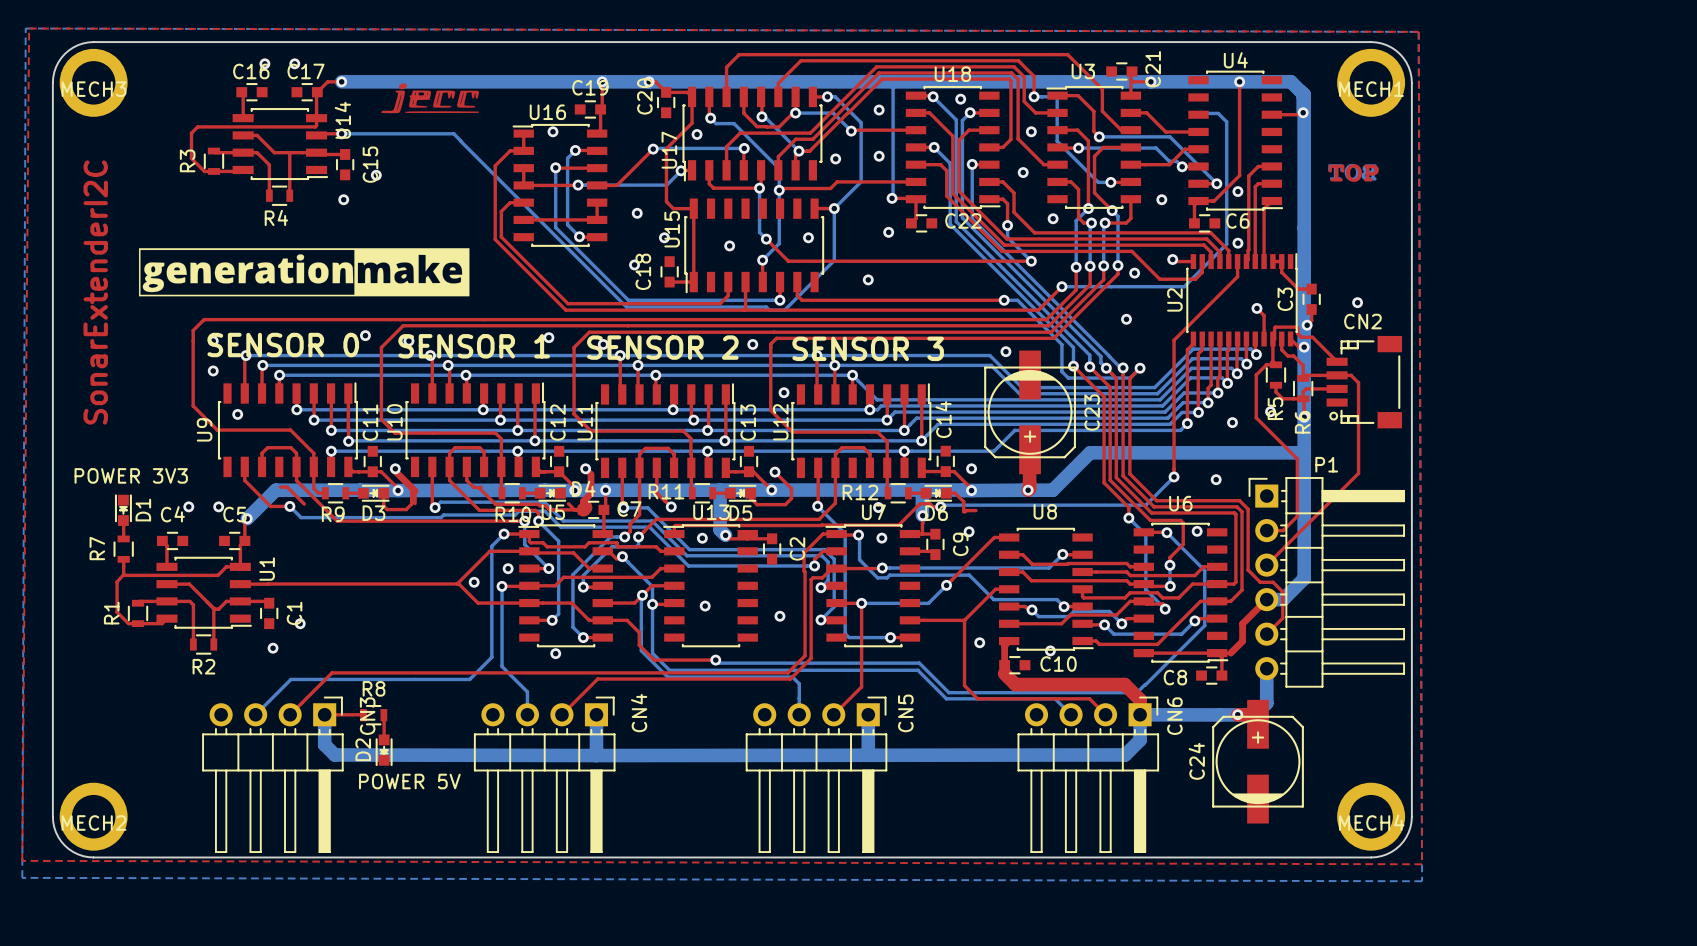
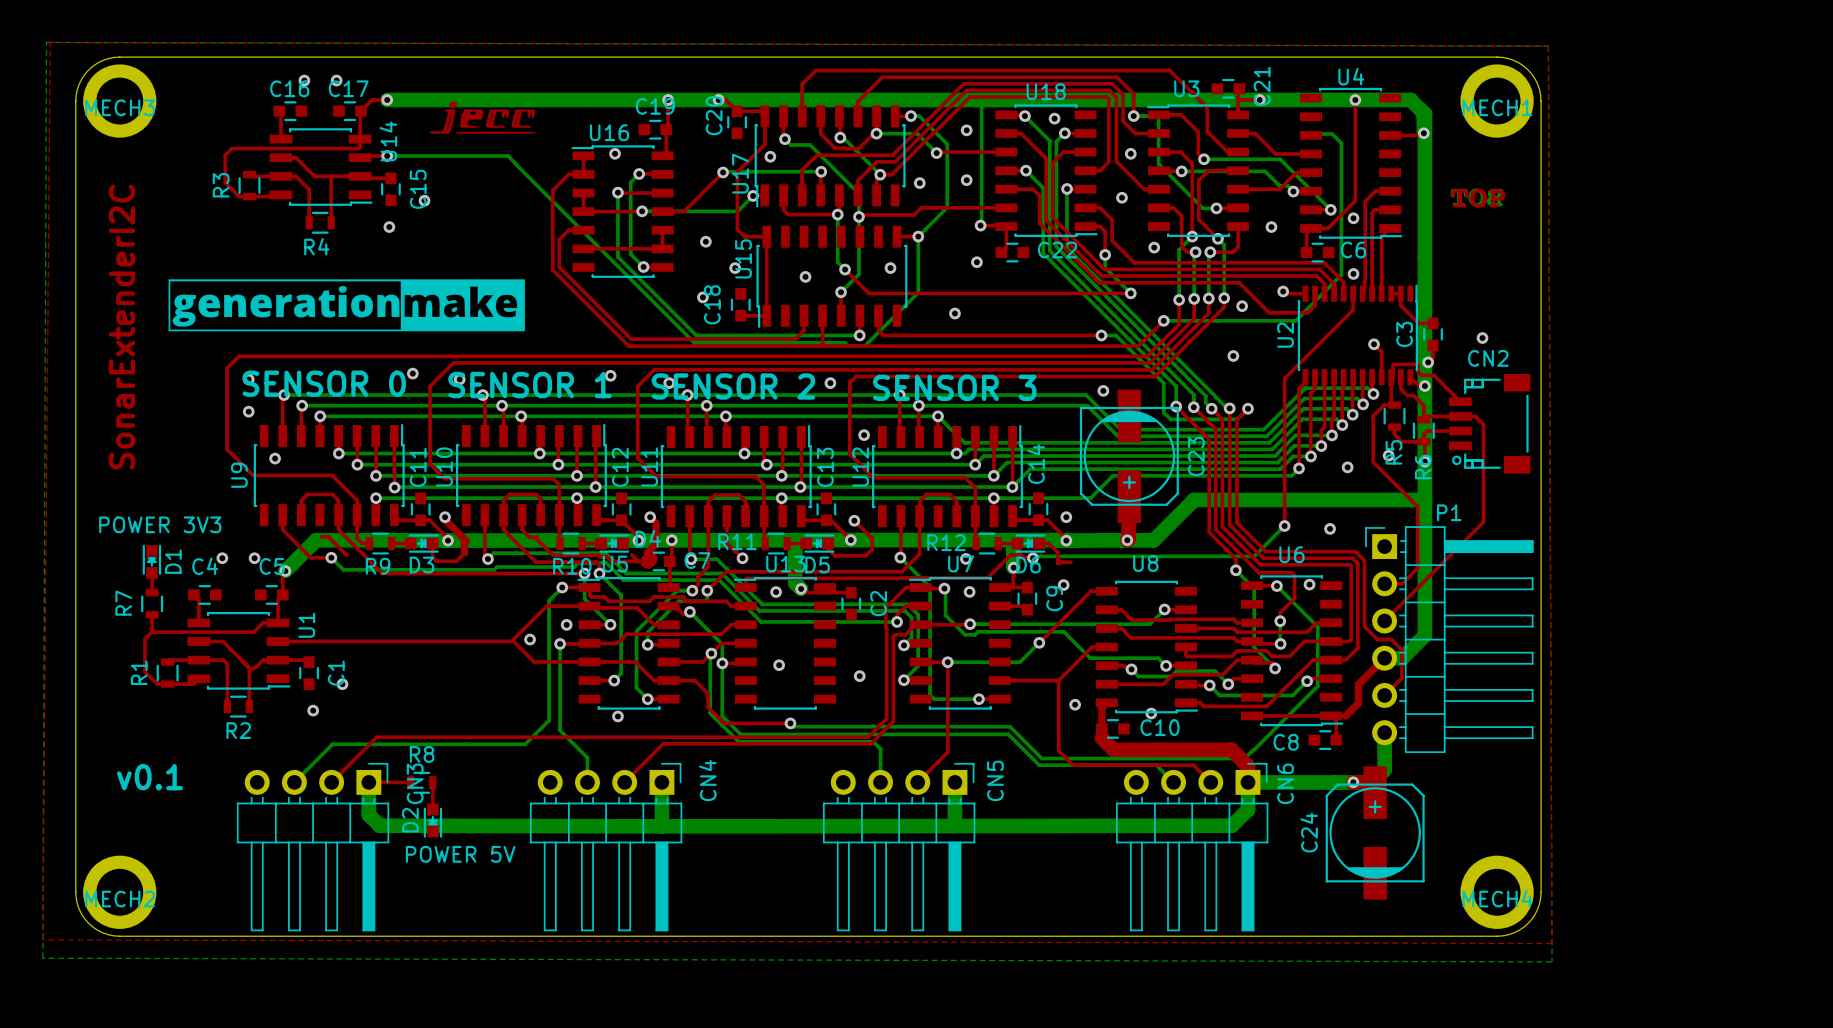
text: none -> v0.1 (150, 777)

